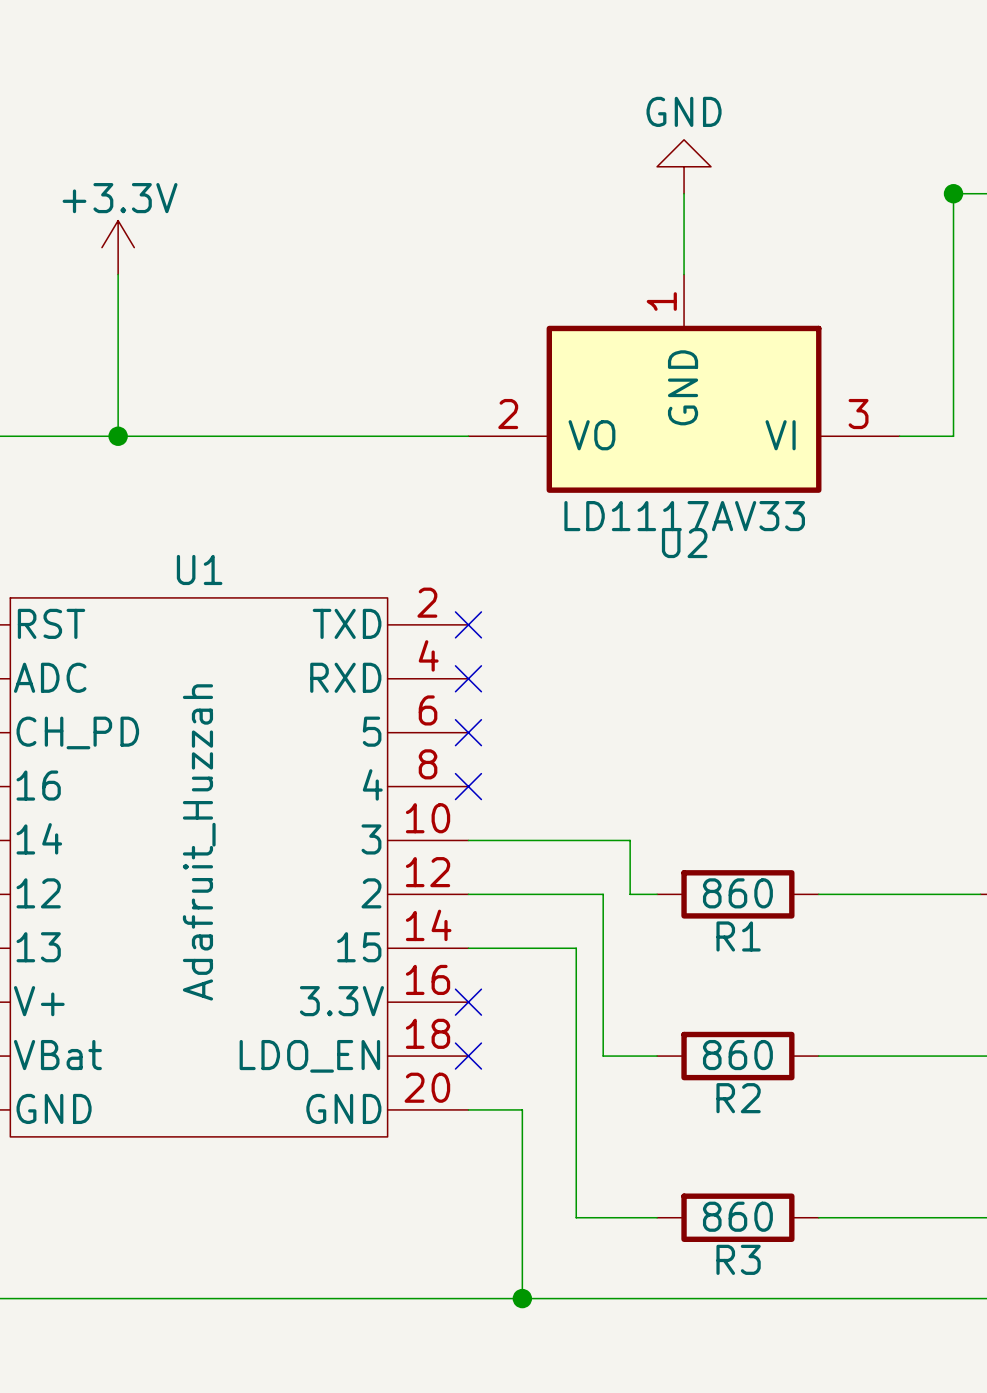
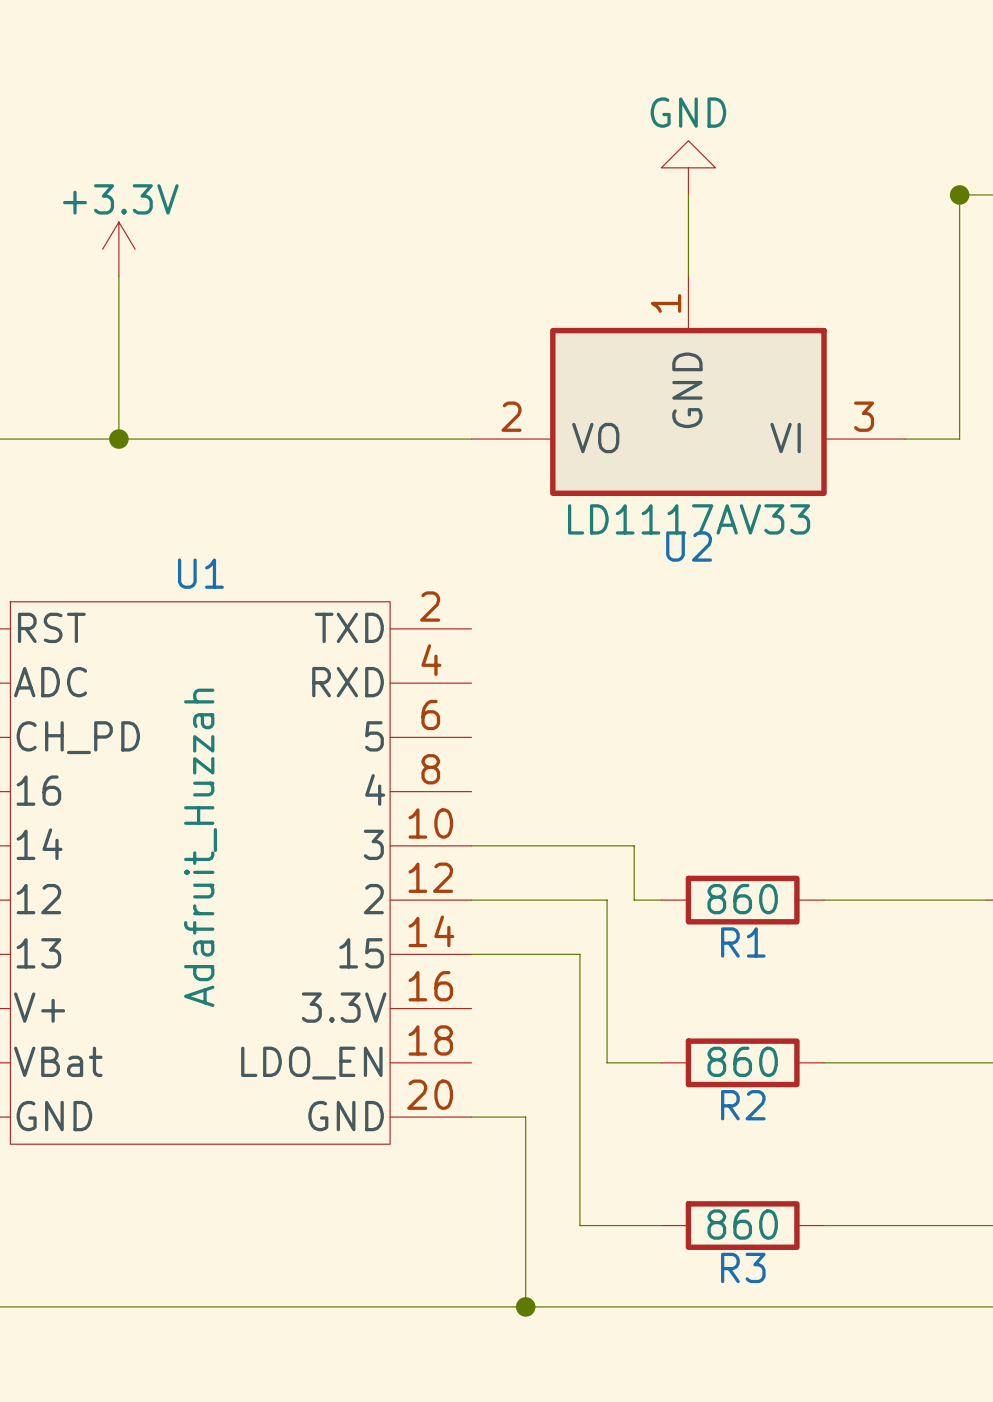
no-connect mark: (468, 624) -> none
no-connect mark: (468, 678) -> none
no-connect mark: (468, 732) -> none
no-connect mark: (468, 786) -> none
no-connect mark: (468, 1002) -> none
no-connect mark: (468, 1056) -> none

